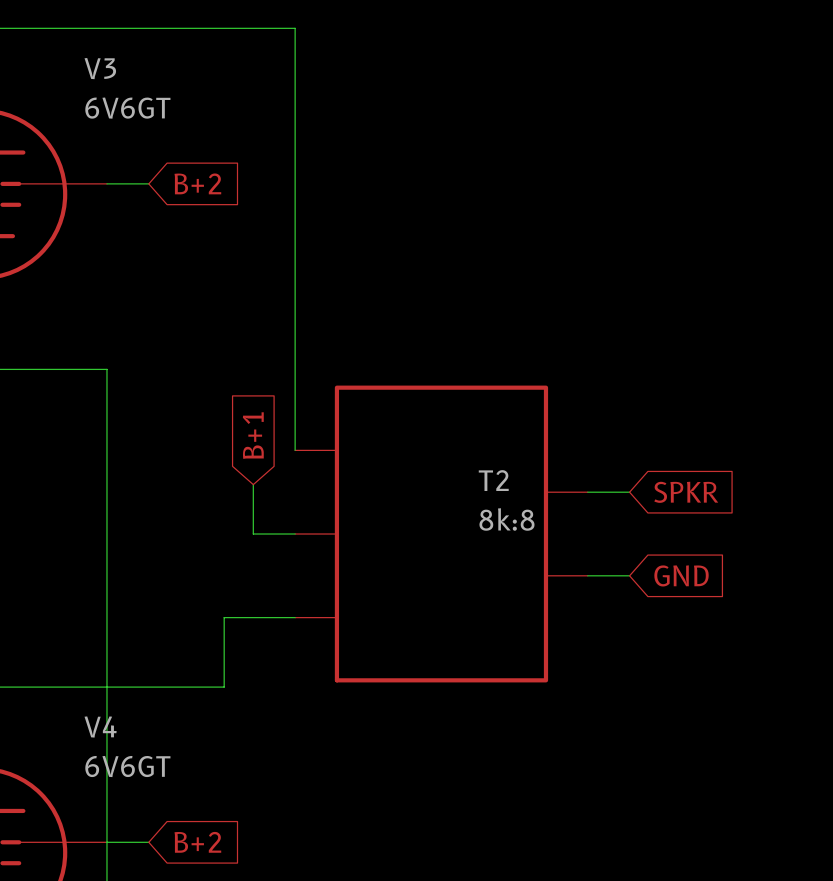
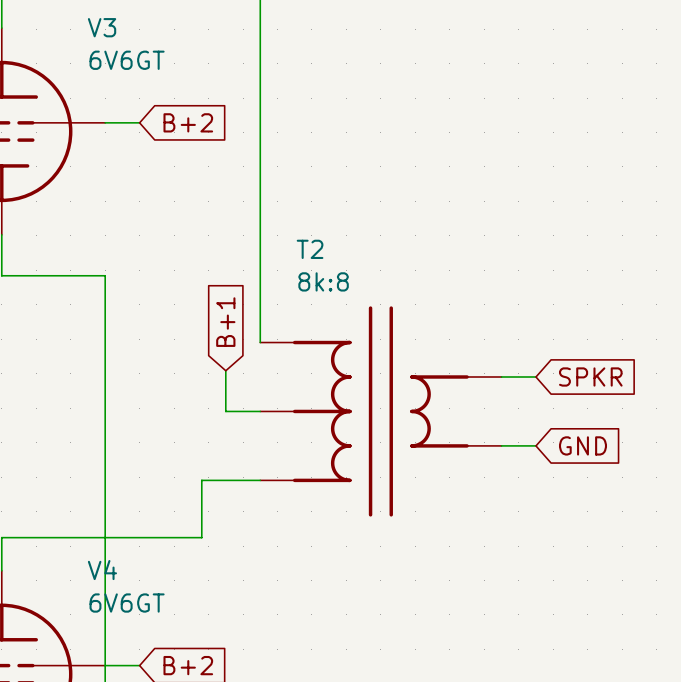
T2 symbol: [295, 385, 588, 683] -> [260, 306, 502, 517]
T2 name position: T2 (493, 480) -> T2 (310, 249)
T2 value position: 8k:8 (506, 519) -> 8k:8 (323, 281)

